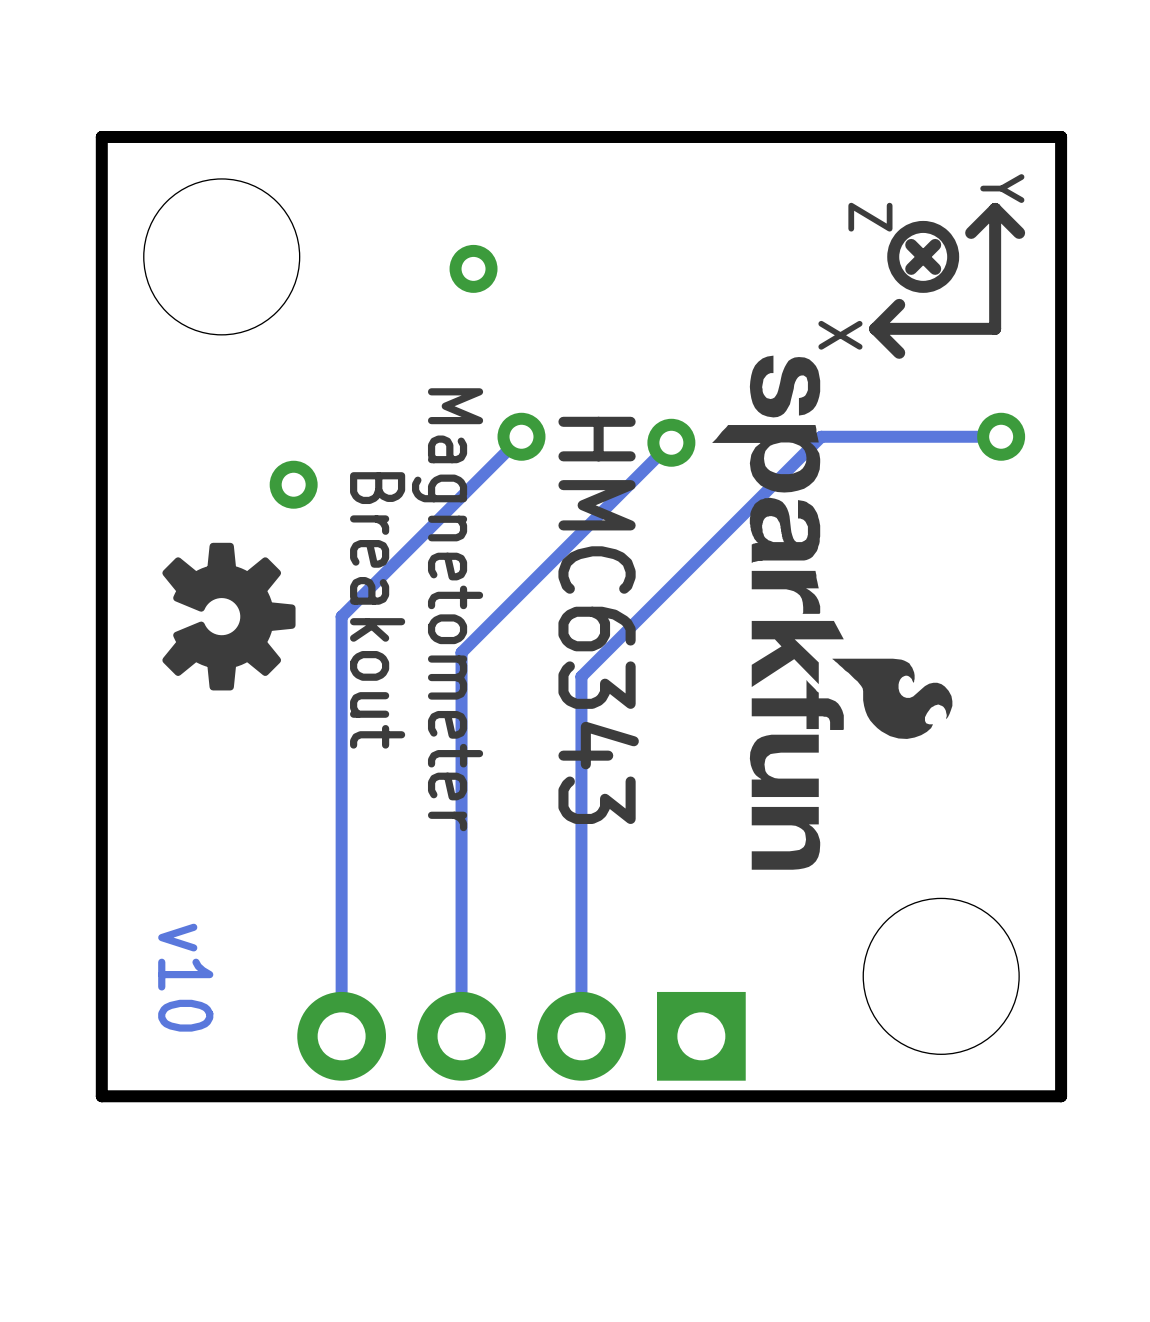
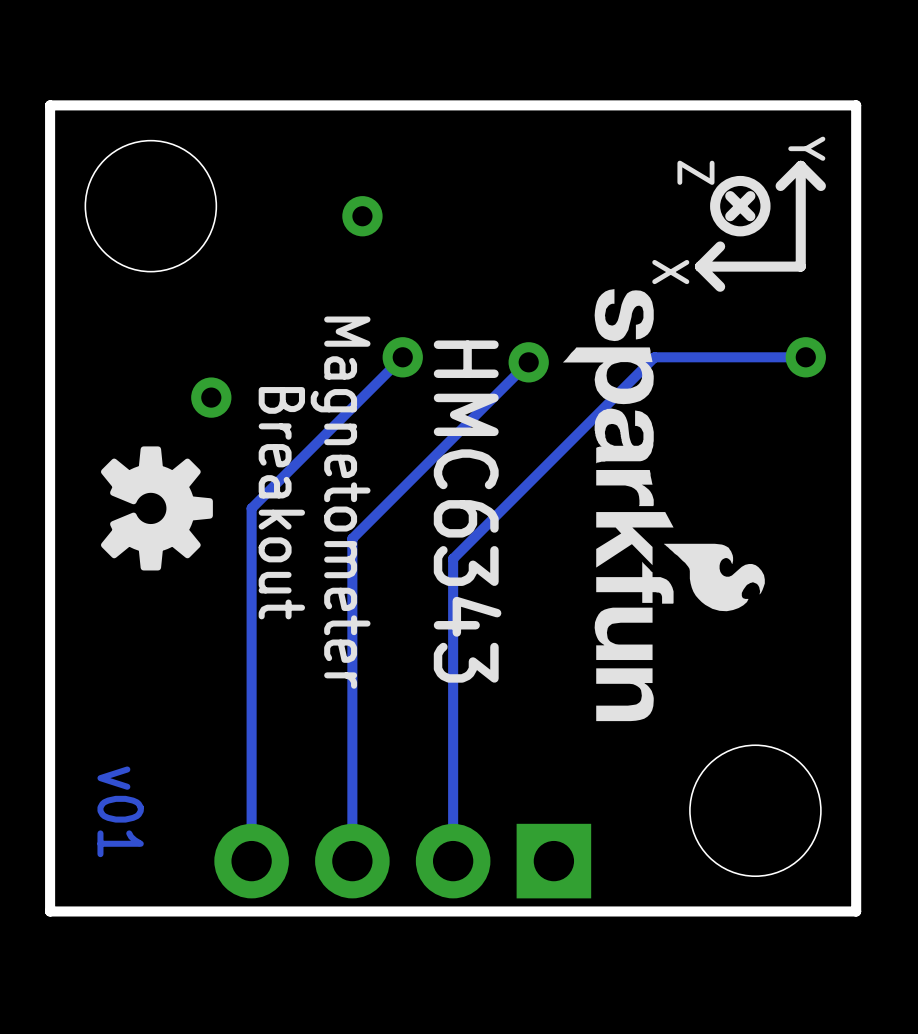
text: v10 (185, 977) -> v01 (120, 811)

